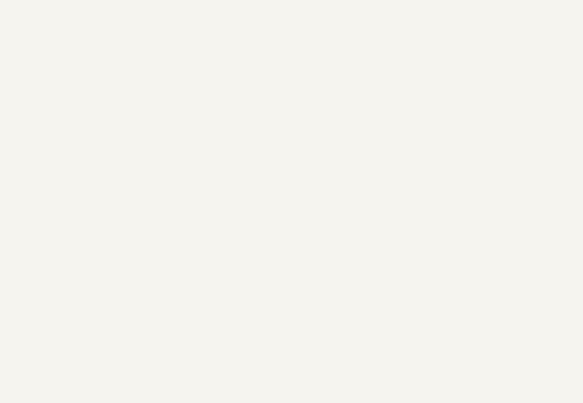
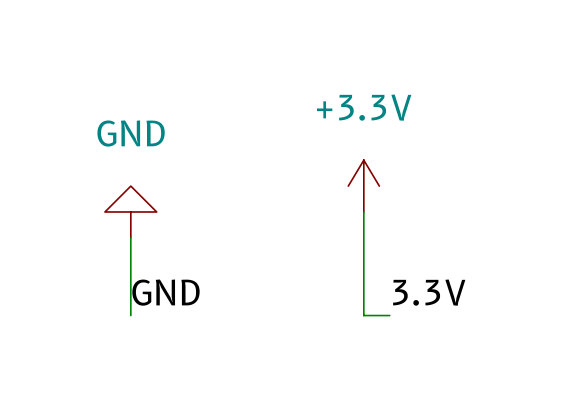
power symbol: none -> +3.3V (363, 186)
power symbol: none -> GND (130, 211)
wire: none -> (363, 211) (363, 315) (389, 315)
wire: none -> (130, 237) (130, 315)
label: none -> GND (165, 292)
label: none -> 3.3V (429, 292)

